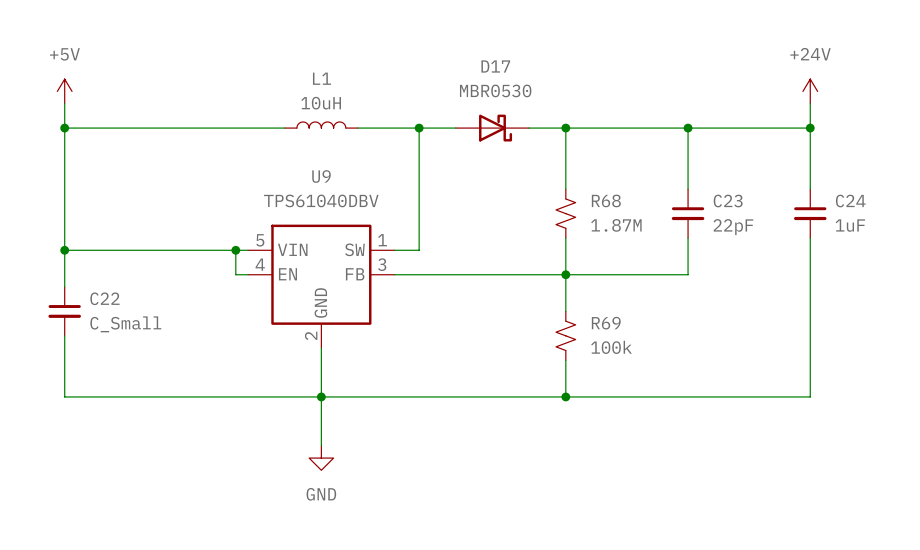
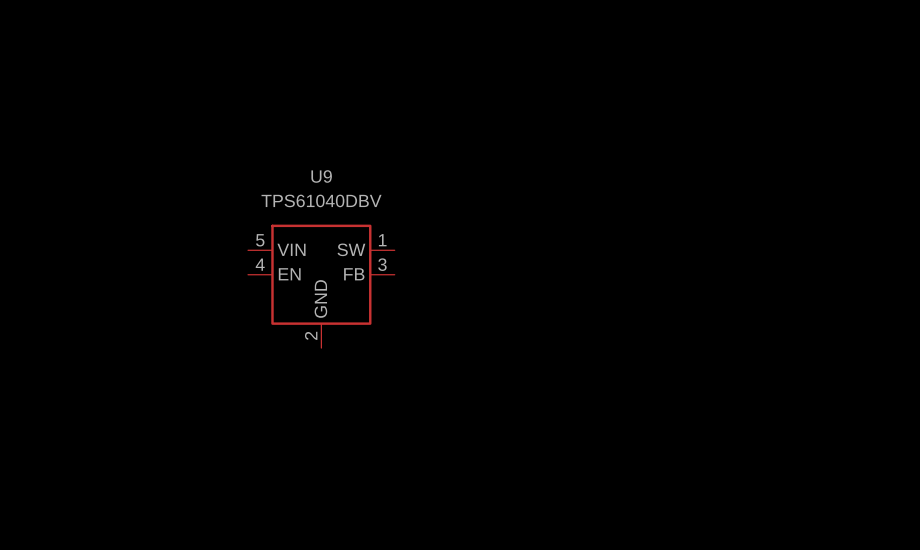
power symbol: +5V (64, 91) -> none
power symbol: +24V (810, 91) -> none
wire: (64, 103) (64, 286) -> none
wire: (810, 103) (810, 189) -> none
L1: 10uH (321, 125) -> none
wire: (64, 128) (284, 128) -> none
junction: (64, 128) -> none
wire: (358, 128) (455, 128) -> none
wire: (419, 128) (419, 250) (394, 250) -> none
junction: (419, 128) -> none
D17: MBR0530 (492, 128) -> none
wire: (529, 128) (810, 128) -> none
wire: (565, 128) (565, 189) -> none
junction: (565, 128) -> none
wire: (688, 128) (688, 189) -> none
junction: (688, 128) -> none
junction: (810, 128) -> none
R68: 1.87M (565, 213) -> none
C23: 22pF (688, 213) -> none
C24: 1uF (810, 213) -> none
wire: (565, 238) (565, 311) -> none
wire: (688, 238) (688, 274) (394, 274) -> none
wire: (810, 238) (810, 396) (64, 396) (64, 335) -> none
wire: (64, 250) (248, 250) -> none
junction: (64, 250) -> none
wire: (235, 250) (235, 274) (248, 274) -> none
junction: (235, 250) -> none
junction: (565, 274) -> none
C22: C_Small (64, 311) -> none
R69: 100k (565, 335) -> none
wire: (321, 348) (321, 445) -> none
wire: (565, 360) (565, 396) -> none
junction: (321, 396) -> none
junction: (565, 396) -> none
power symbol: GND (321, 458) -> none

